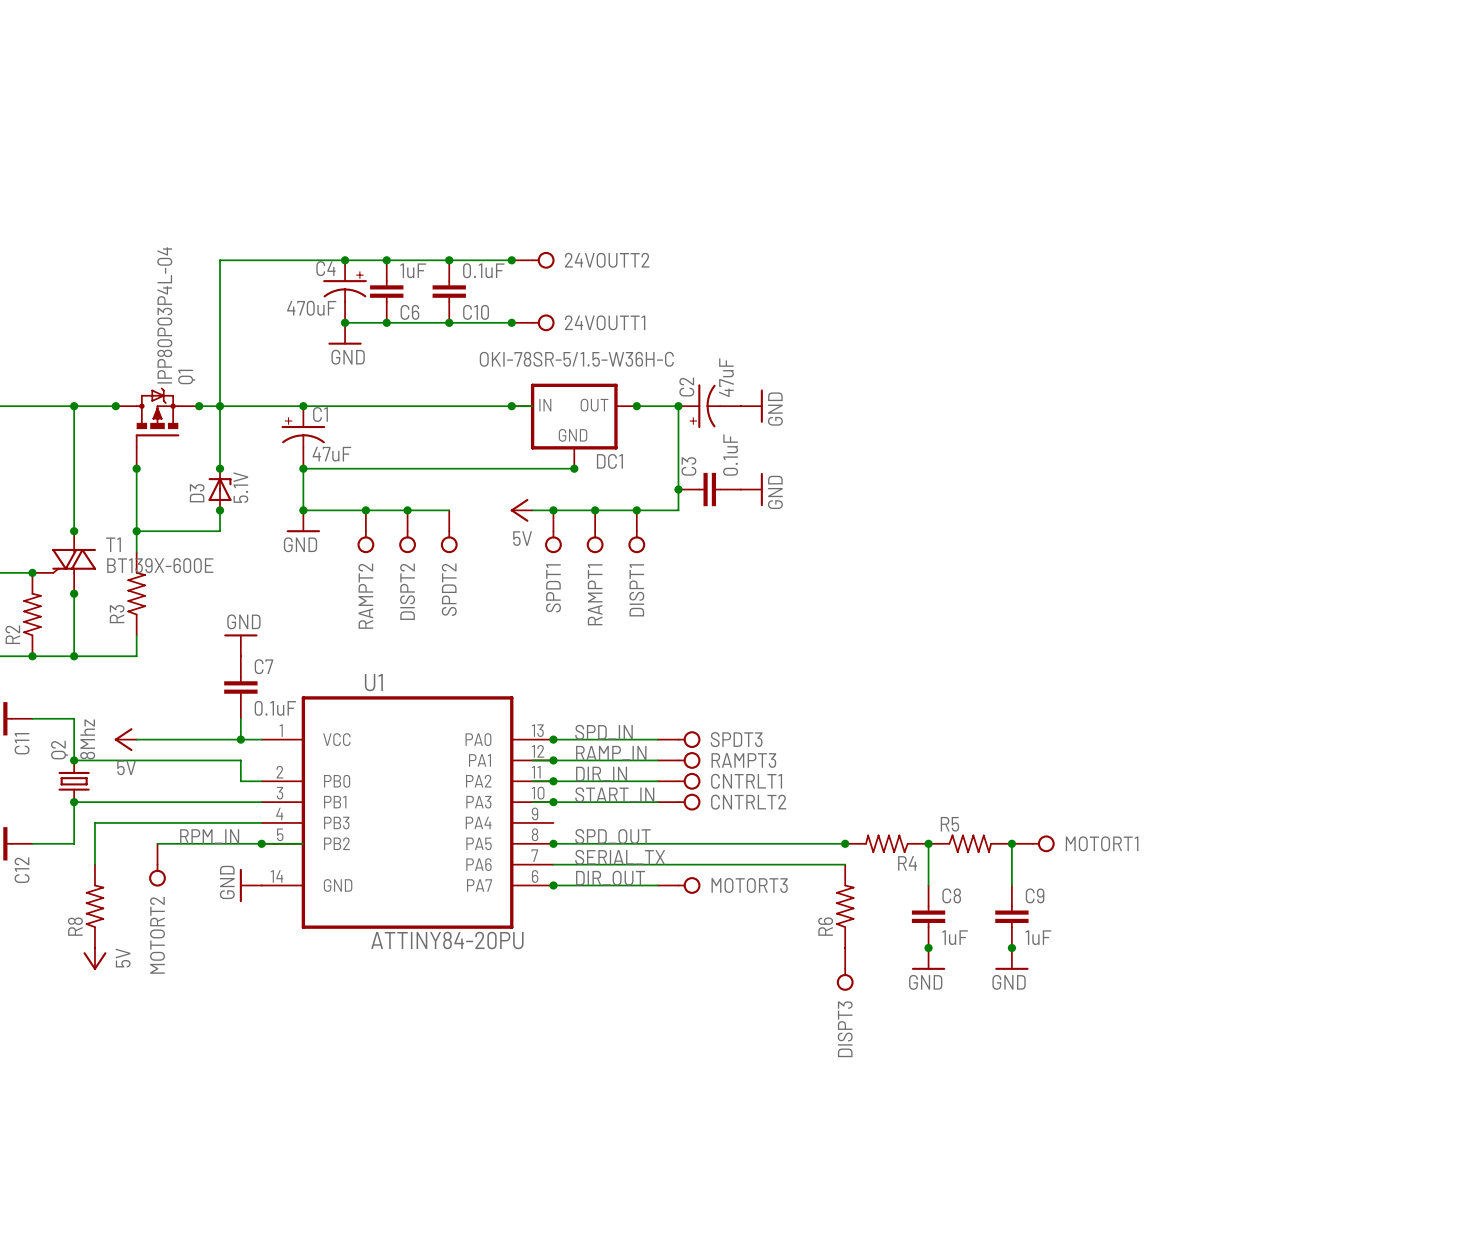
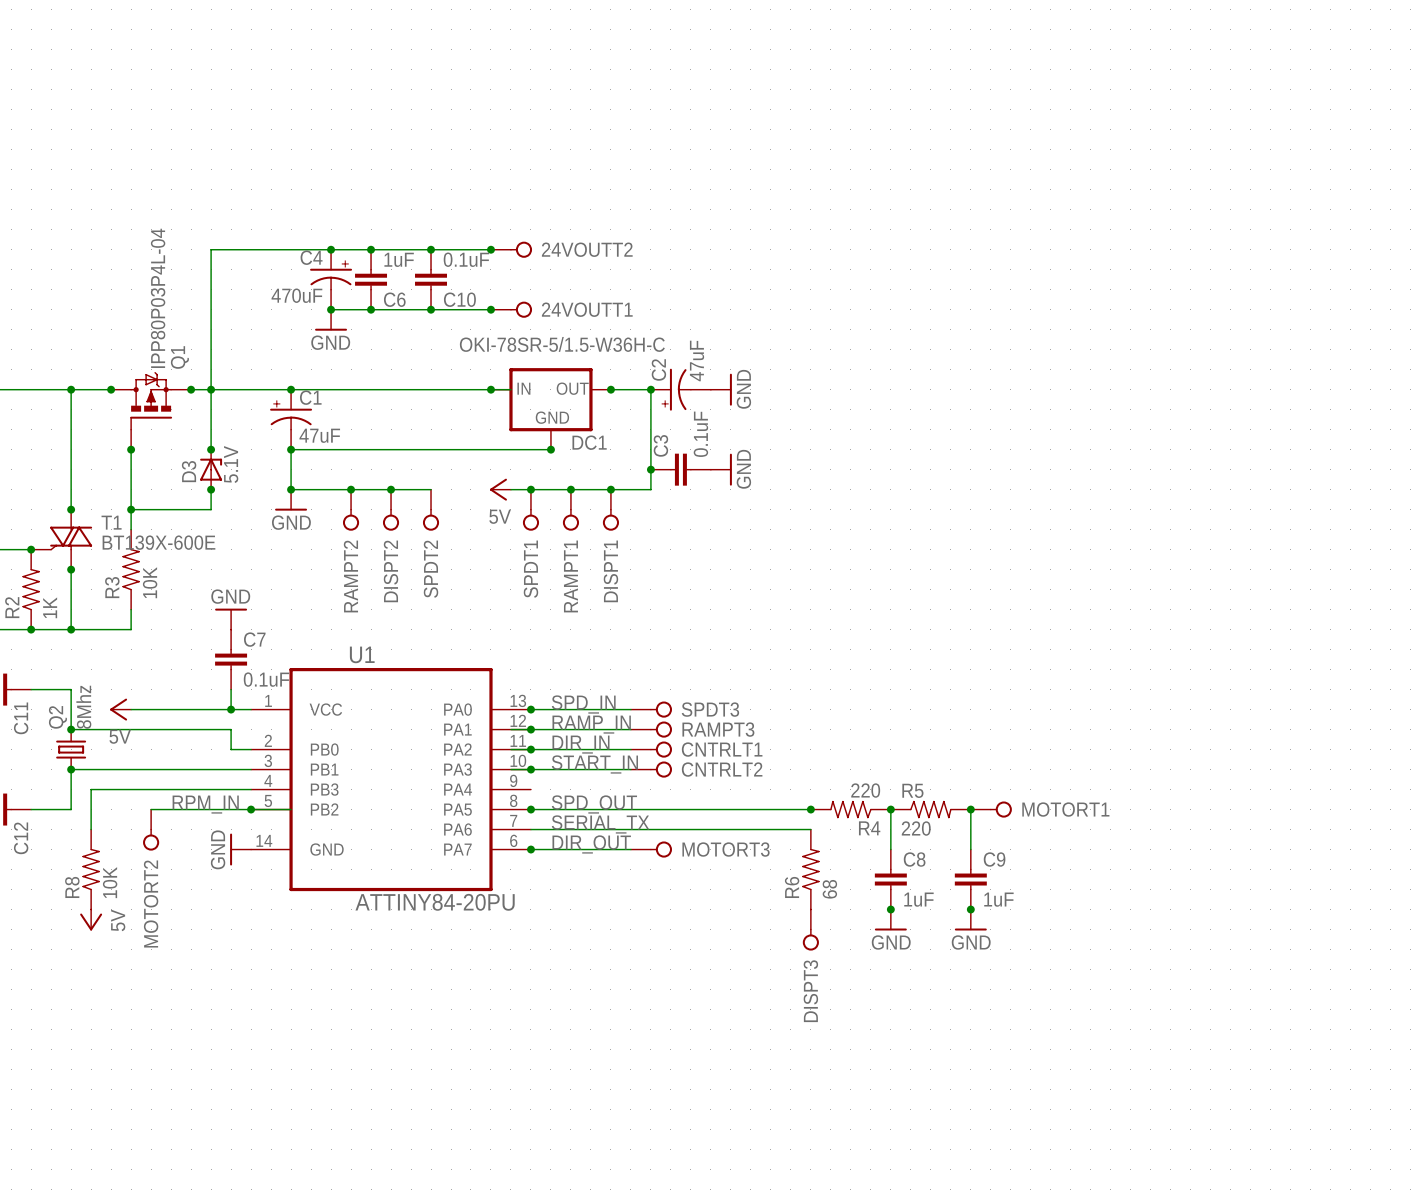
R3 value: none -> 10K (150, 582)
R2 value: none -> 1K (50, 607)
R4 value: none -> 220 (865, 790)
R5 value: none -> 220 (916, 828)
R8 value: none -> 10K (110, 882)
R6 value: none -> 68 (829, 889)

